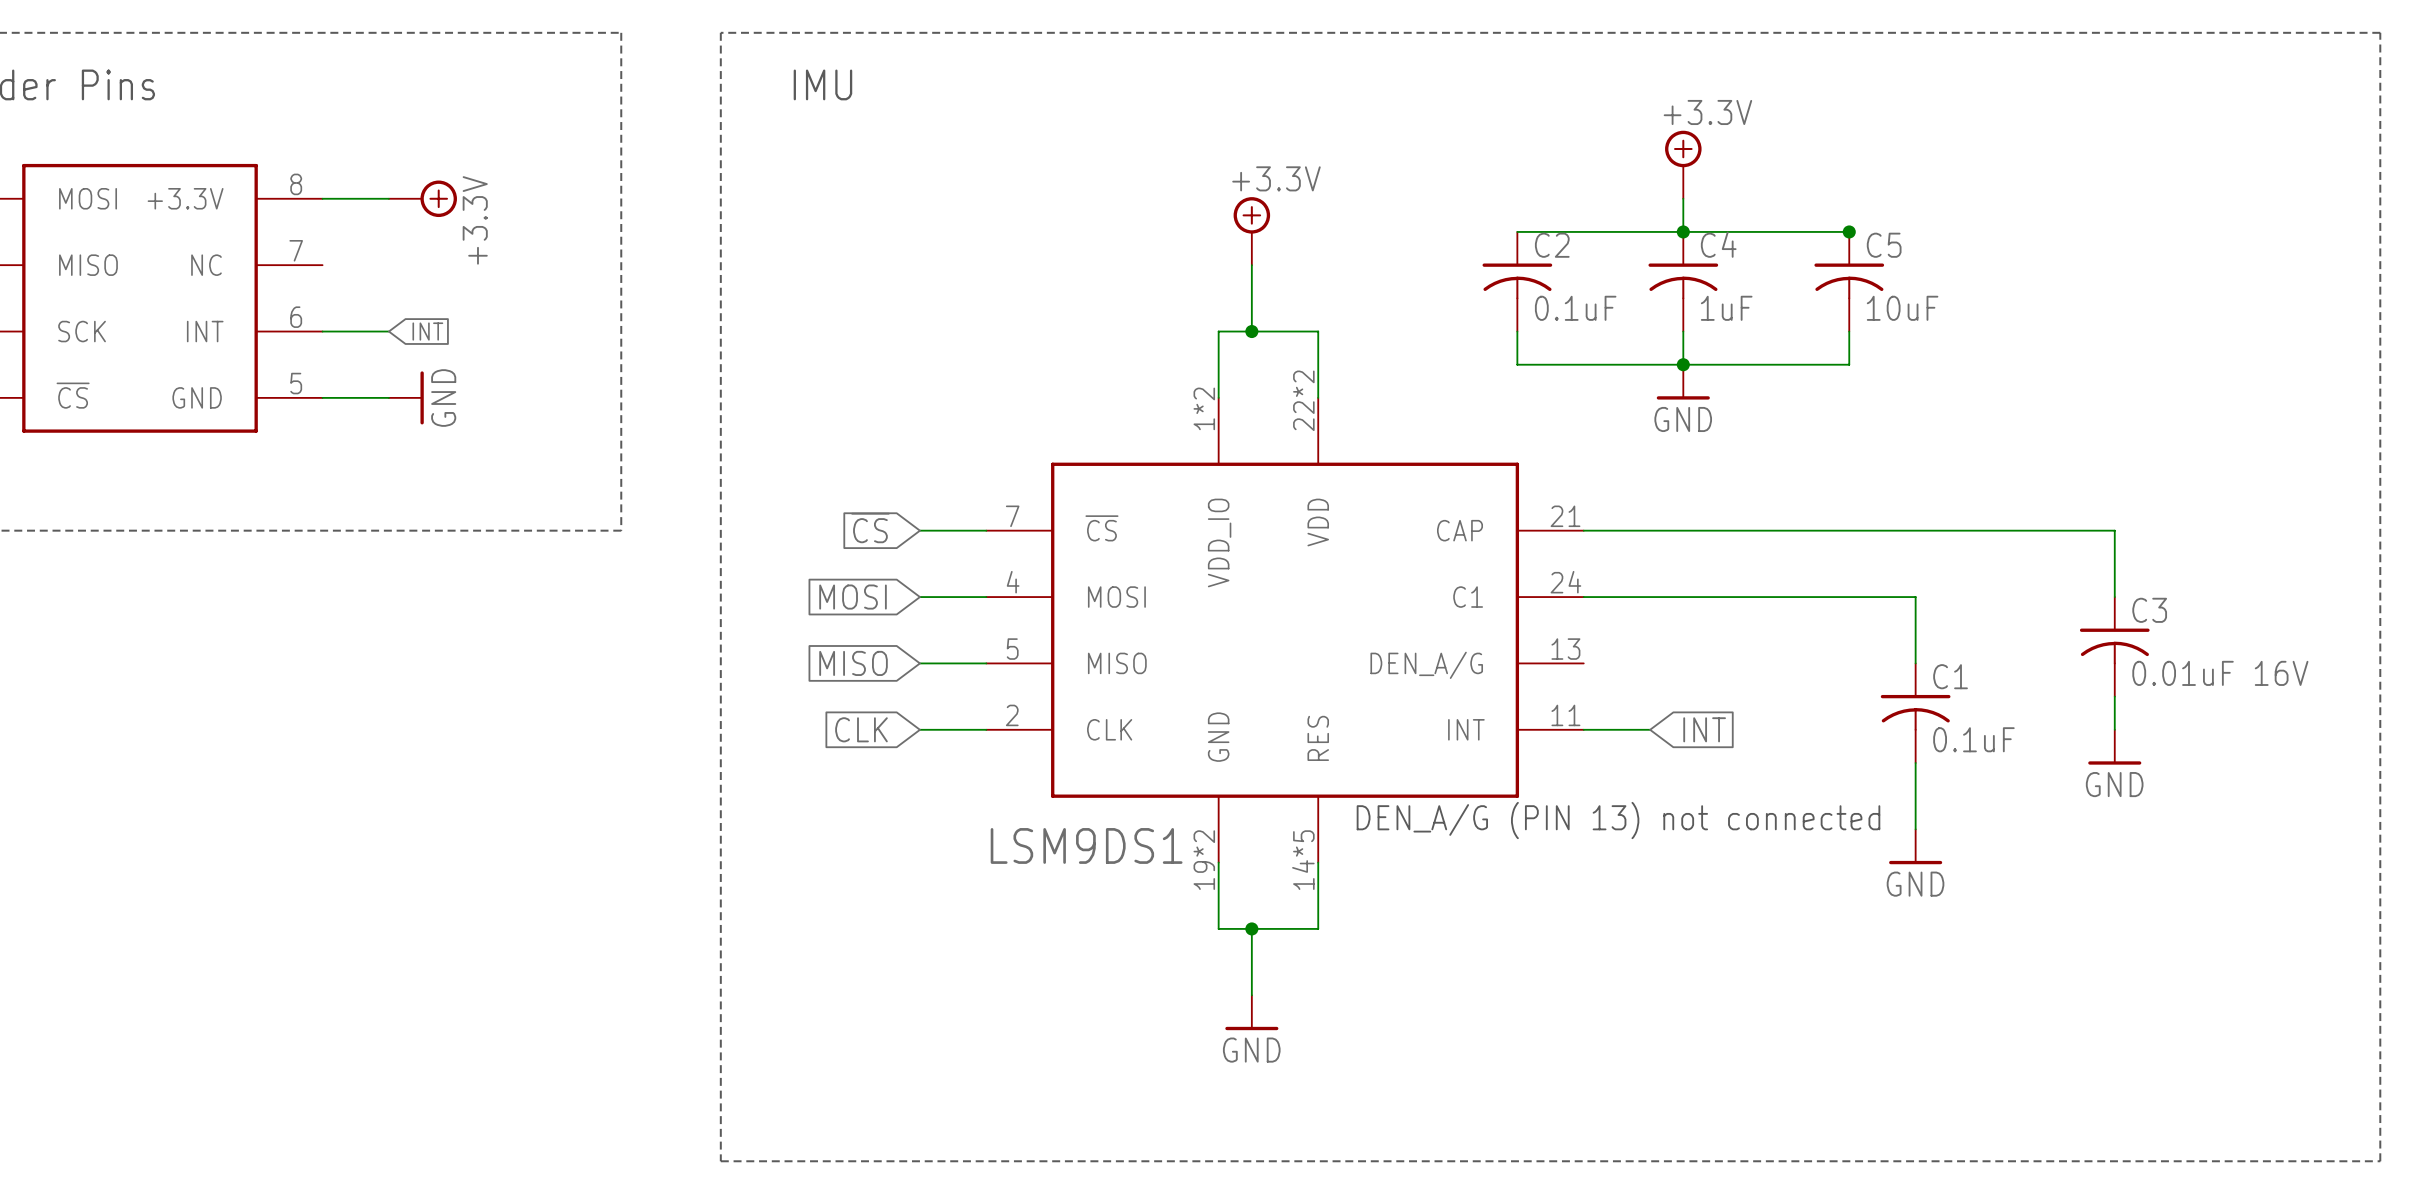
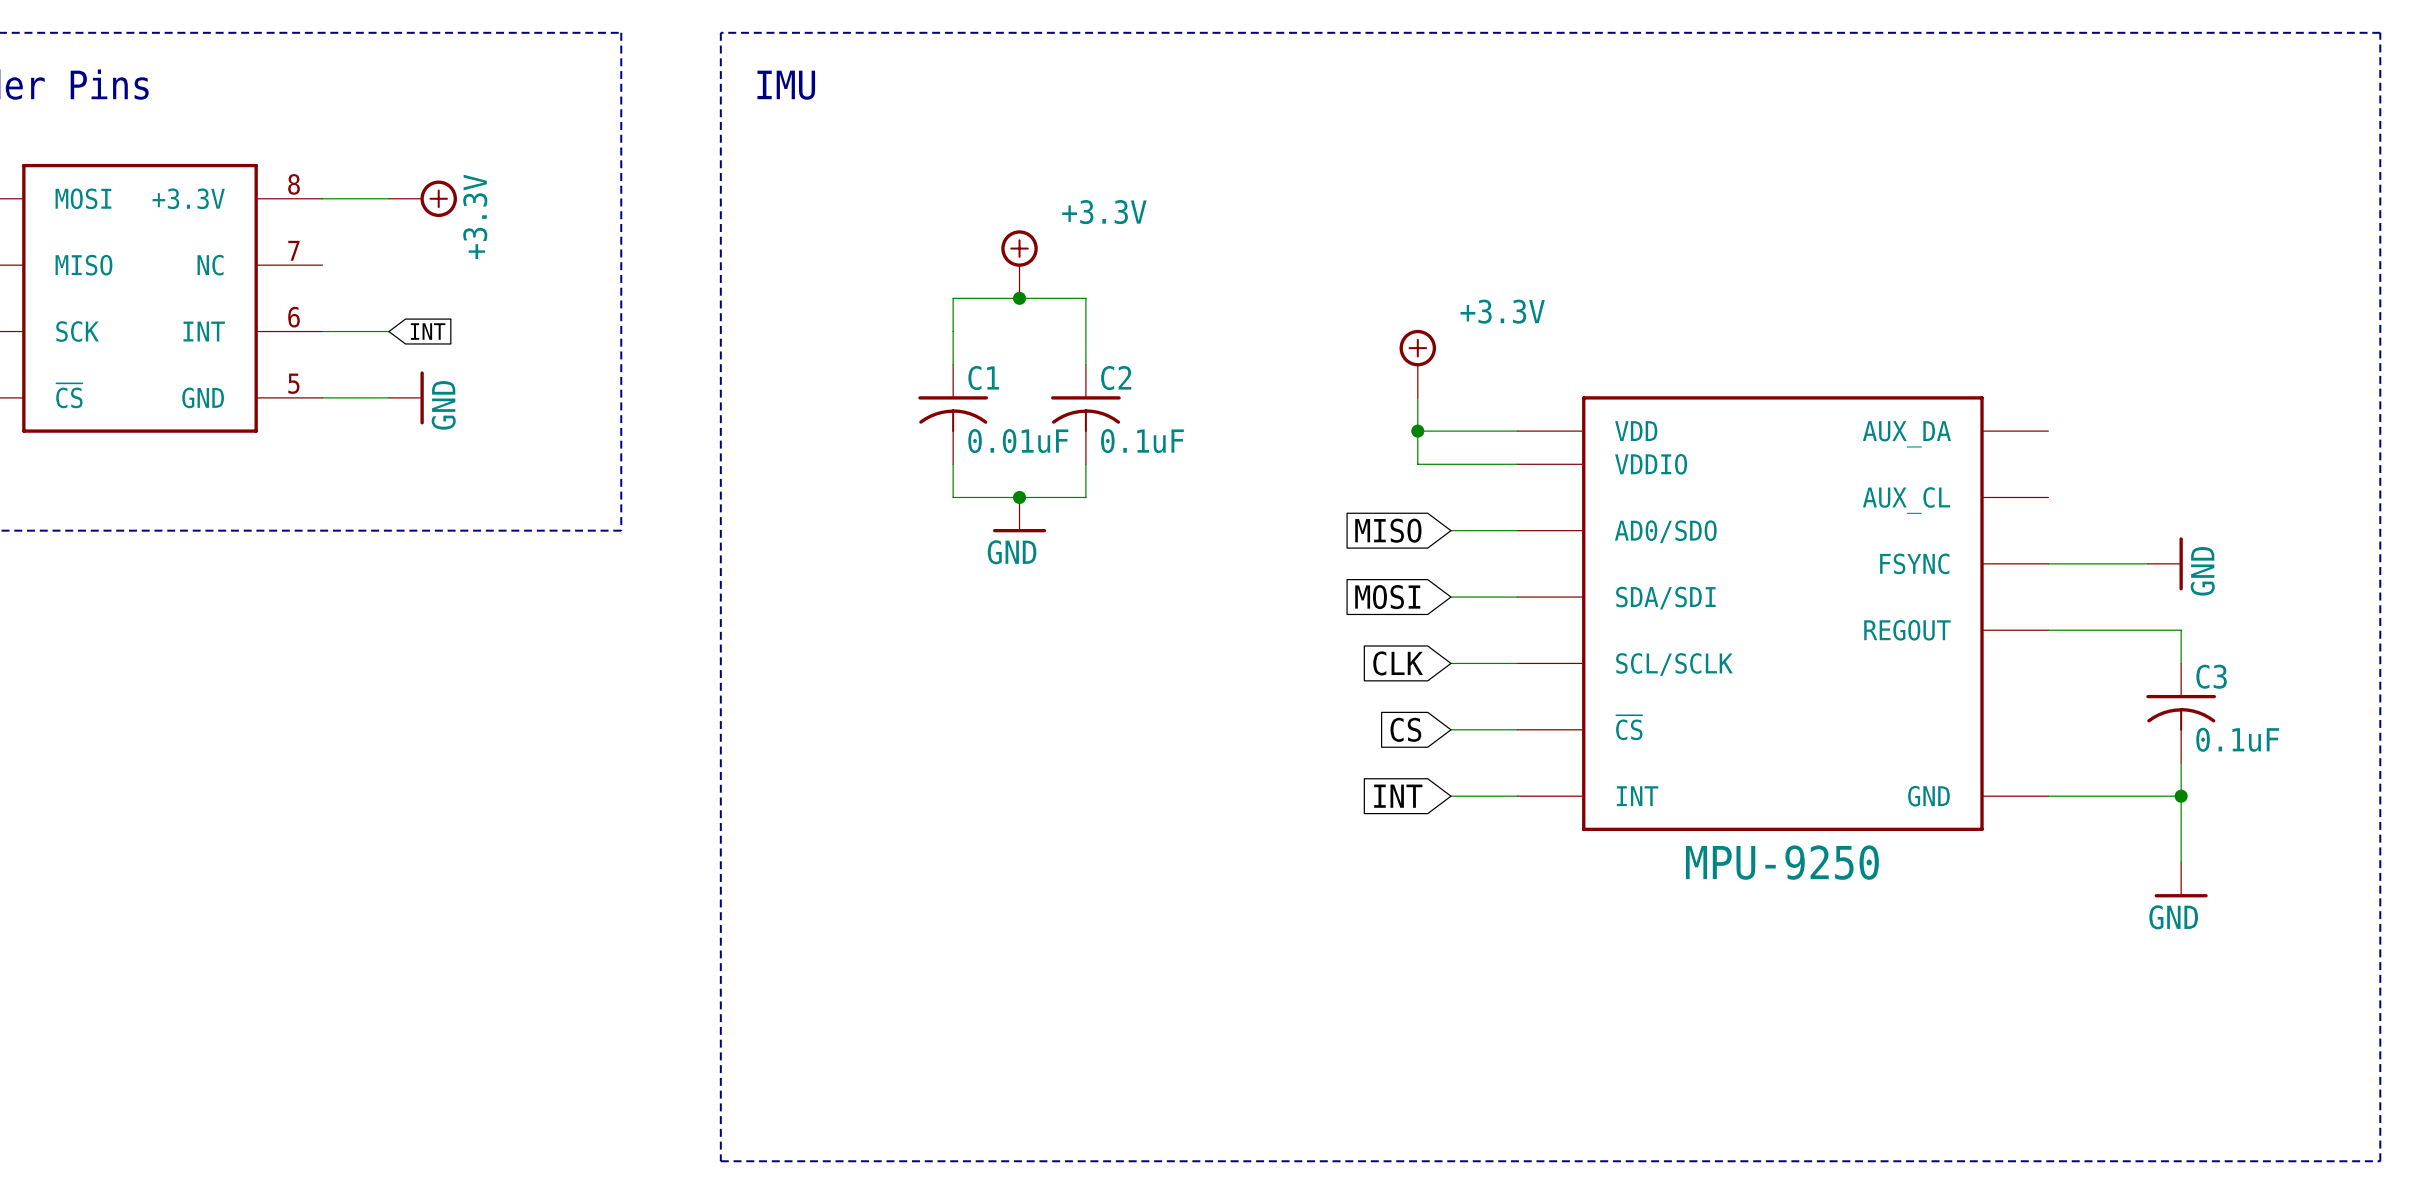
text position: IMU (822, 84) -> IMU (786, 85)
power symbol: +3.3V (1683, 164) -> none
wire: (1683, 198) (1683, 231) -> none
power symbol: +3.3V (1251, 231) -> none
wire: (1517, 231) (1849, 231) -> none
junction: (1683, 231) -> none
junction: (1849, 231) -> none
power symbol: none -> +3.3V (1019, 264)
wire: (1251, 265) (1251, 331) -> none
C2 position: (1517, 281) -> (1085, 414)
C4: 1uF (1683, 281) -> none
C5: 10uF (1849, 281) -> none
junction: none -> (1019, 298)
junction: (1251, 331) -> none
wire: (1517, 331) (1517, 364) (1849, 364) (1849, 331) -> none
wire: (1683, 331) (1683, 364) -> none
power symbol: none -> +3.3V (1417, 363)
wire: none -> (953, 364) (953, 298) (1085, 298) (1085, 364)
junction: (1683, 364) -> none
power symbol: GND (1683, 382) -> none
wire: (1218, 397) (1218, 331) (1318, 331) (1318, 397) -> none
wire: none -> (1417, 397) (1417, 464) (1517, 464)
wire: none -> (1417, 431) (1517, 431)
junction: none -> (1417, 431)
wire: none -> (953, 464) (953, 497) (1085, 497) (1085, 464)
junction: none -> (1019, 497)
power symbol: none -> GND (1019, 514)
global label: ~{CS} (870, 527) -> none
wire: (919, 530) (986, 530) -> none
global label: none -> MISO (1388, 530)
wire: none -> (1450, 530) (1517, 530)
wire: (1583, 530) (2114, 530) (2114, 597) -> none
wire: none -> (2048, 563) (2147, 563)
power symbol: none -> GND (2165, 563)
global label: MOSI (853, 597) -> none
wire: (919, 597) (986, 597) -> none
global label: none -> MOSI (1387, 597)
wire: none -> (1450, 597) (1517, 597)
wire: (1583, 597) (1915, 597) (1915, 663) -> none
part: none -> MPU-9250 (1782, 613)
part: LSM9DS1 (1285, 630) -> none
wire: none -> (2048, 630) (2181, 630) (2181, 663)
C3 position: (2114, 646) -> (2181, 713)
global label: MISO (853, 663) -> none
wire: (919, 663) (986, 663) -> none
global label: none -> CLK (1398, 663)
wire: none -> (1450, 663) (1517, 663)
C3 value: 0.01uF 16V (2220, 673) -> 0.1uF (2237, 739)
wire: (2114, 696) (2114, 729) -> none
C1 position: (1915, 713) -> (953, 414)
global label: CLK (861, 729) -> none
wire: (919, 729) (986, 729) -> none
global label: none -> CS (1405, 729)
wire: (1583, 729) (1650, 729) -> (1450, 729) (1517, 729)
global label rotation: 0° (1704, 729) -> 180° (1398, 796)
global label position: INT (1704, 729) -> INT (1398, 796)
C1 value: 0.1uF (1973, 739) -> 0.01uF (1018, 441)
power symbol: GND (2114, 747) -> none
wire: (1915, 762) (1915, 829) -> none
wire: none -> (2181, 762) (2181, 862)
wire: none -> (2048, 796) (2181, 796)
junction: none -> (2181, 796)
text: DEN_A/G (PIN 13) not connected (1618, 820) -> none
power symbol: GND (1915, 846) -> none
wire: (1218, 862) (1218, 928) (1318, 928) (1318, 862) -> none
power symbol: none -> GND (2181, 879)
wire: (1251, 928) (1251, 995) -> none
junction: (1251, 928) -> none
power symbol: GND (1251, 1012) -> none

